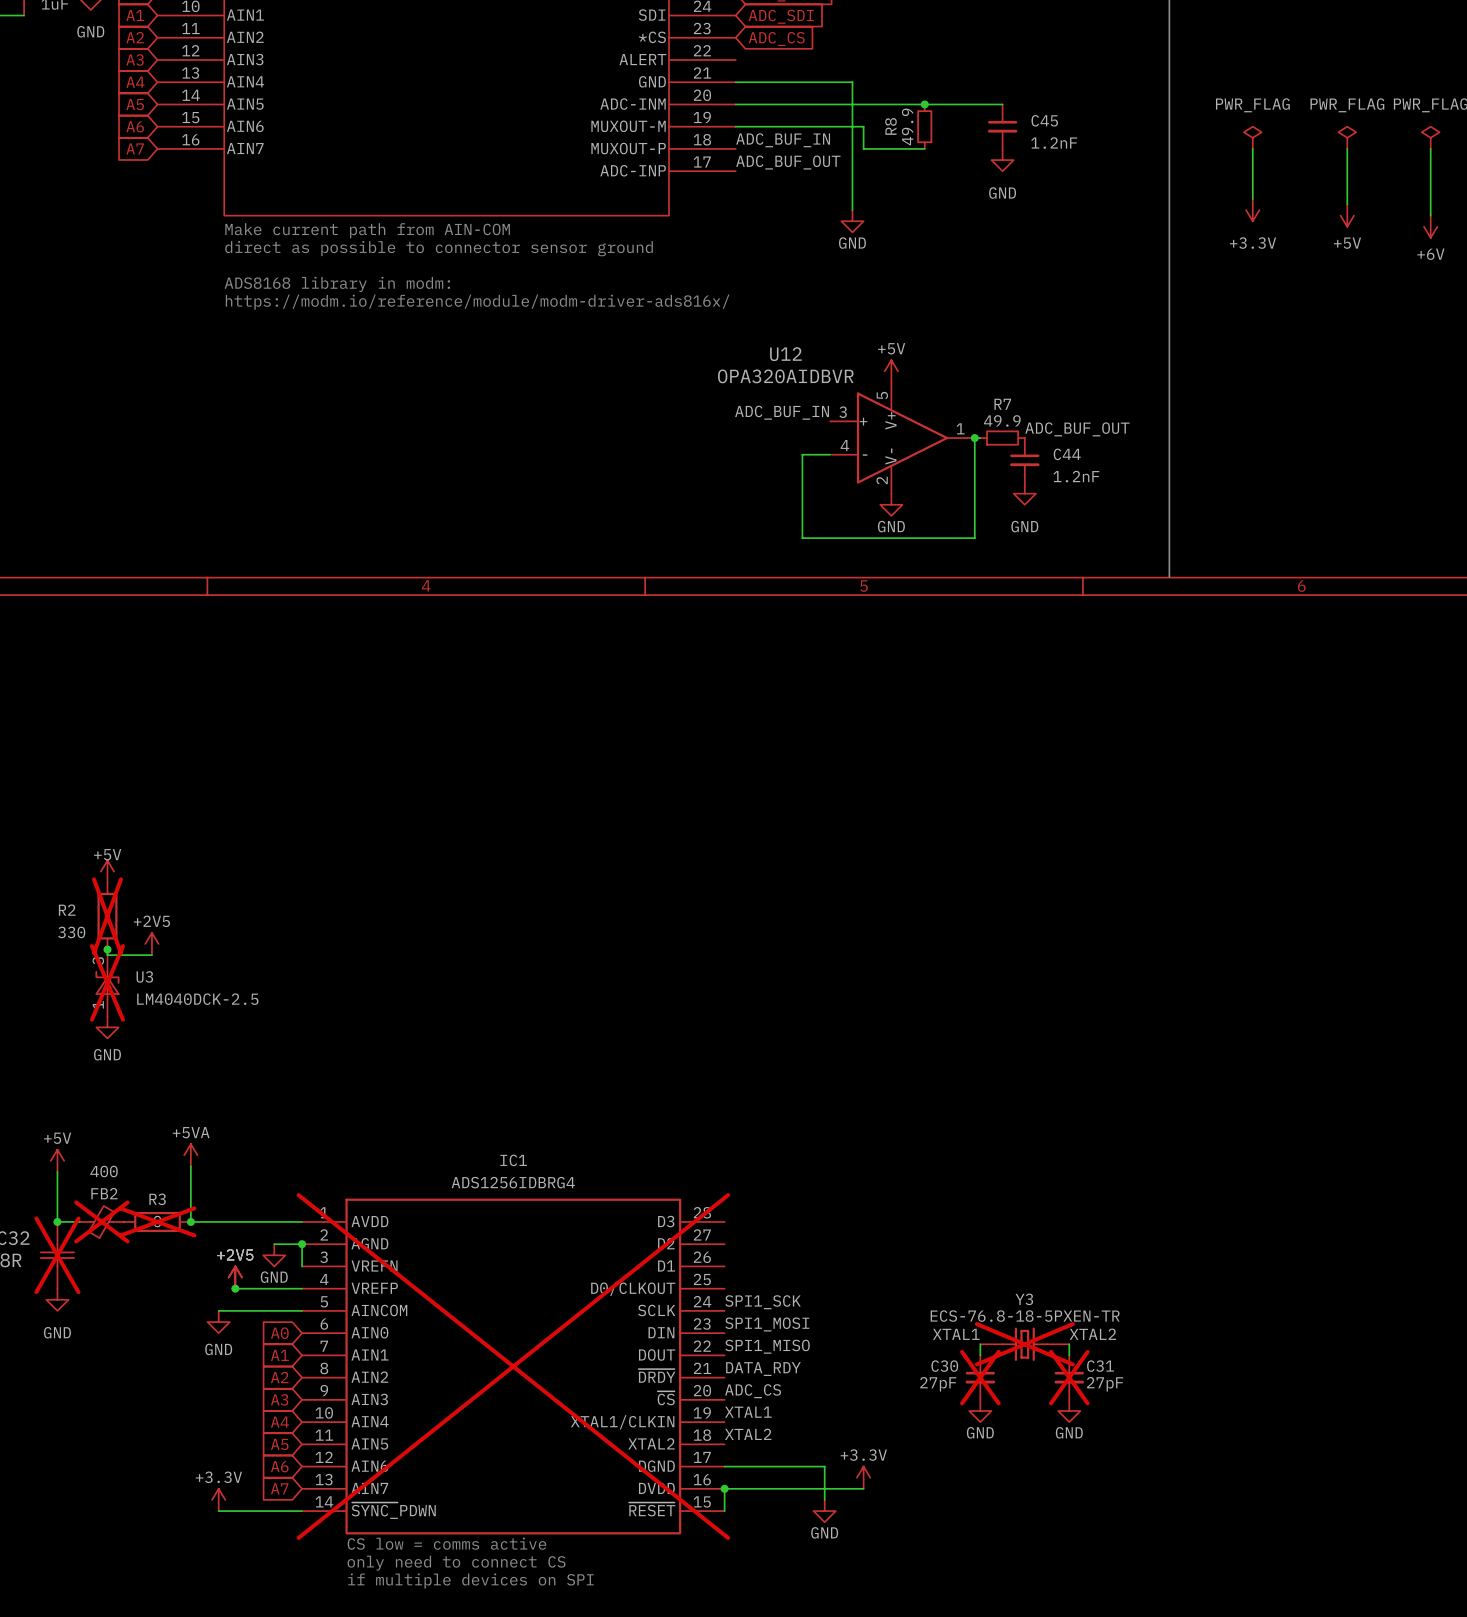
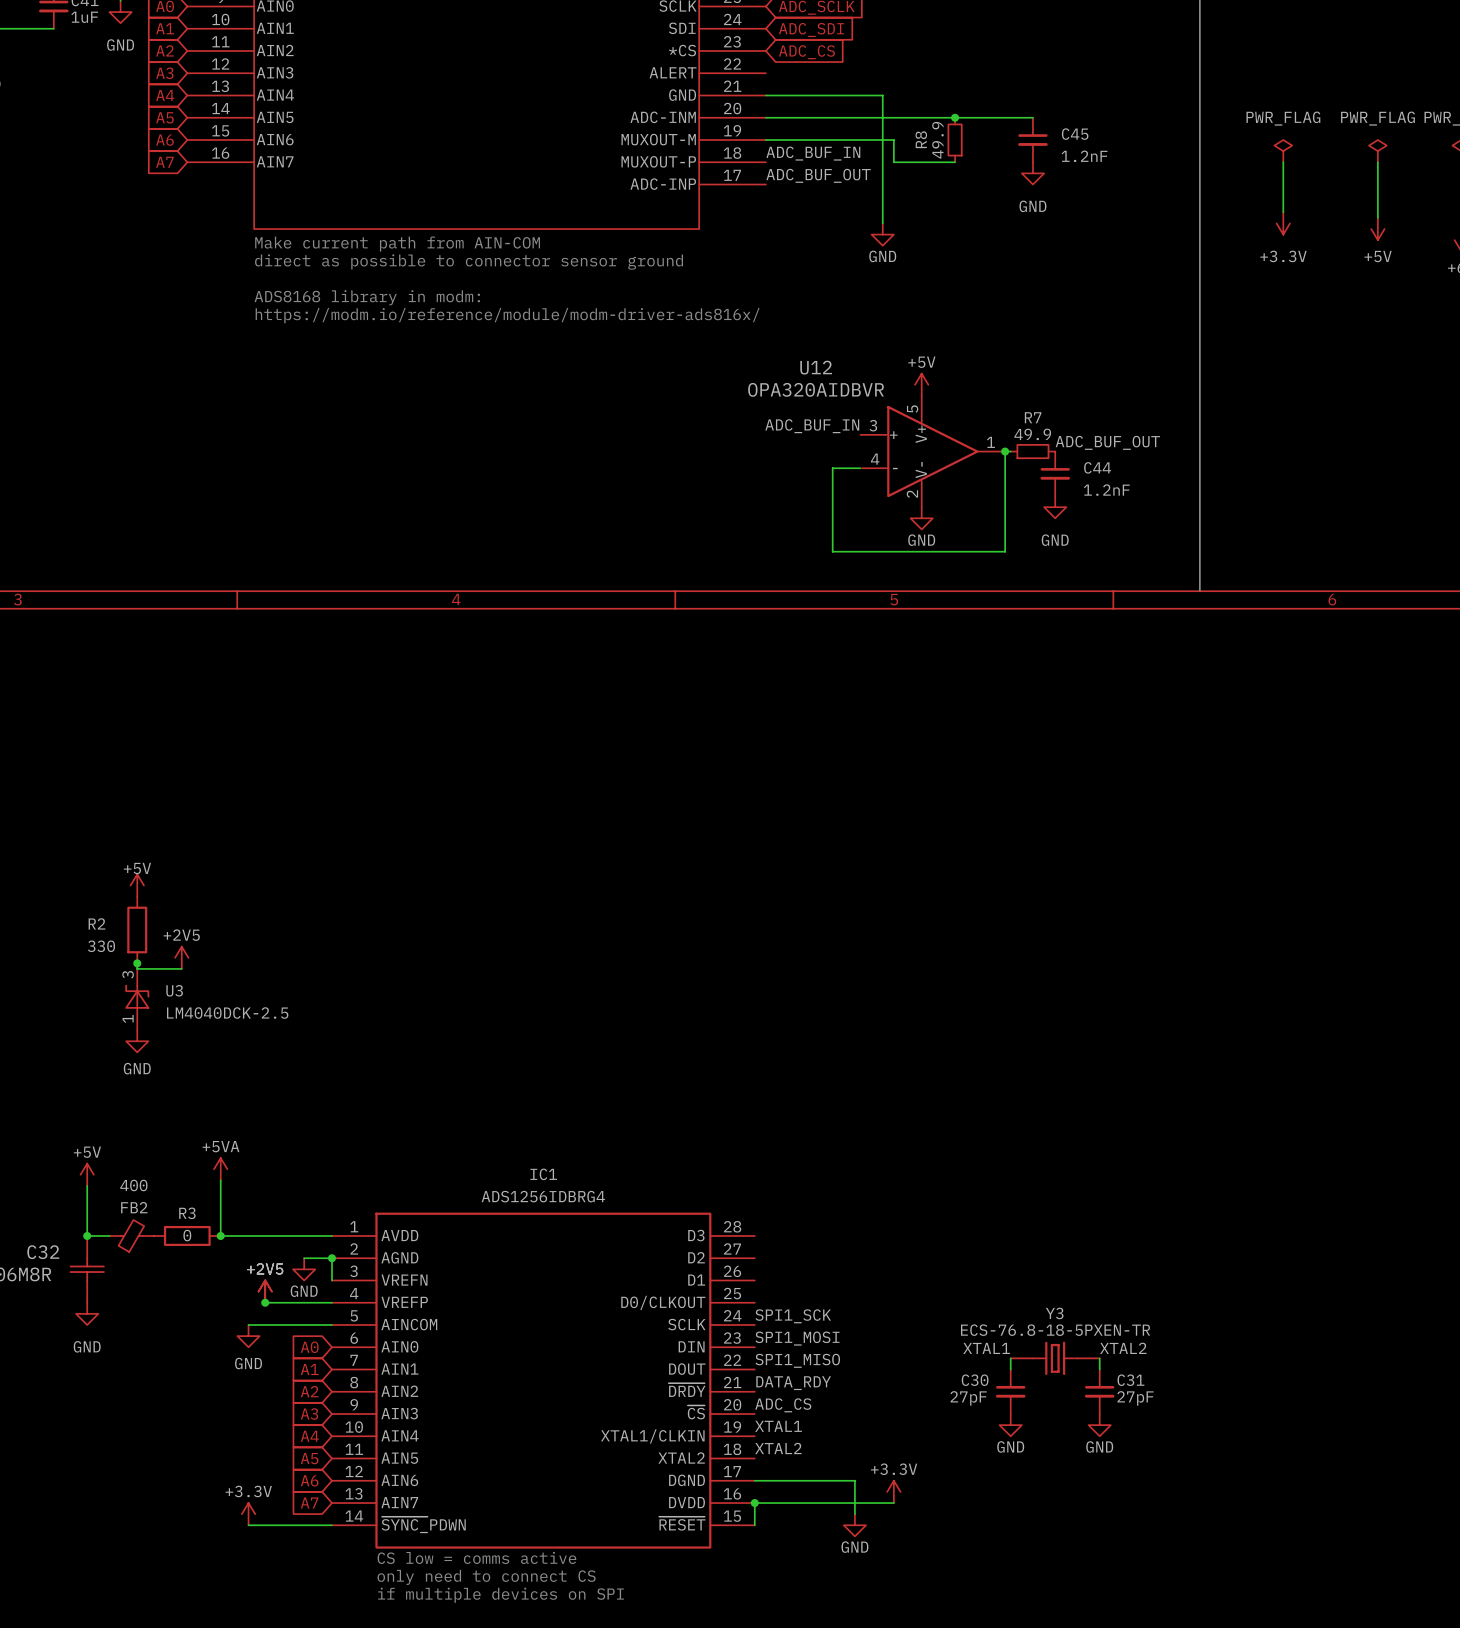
R2 do-not-place cross: (107, 916) -> none
U3 do-not-place cross: (107, 982) -> none
FB2 do-not-place cross: (101, 1221) -> none
R3 do-not-place cross: (157, 1221) -> none
C32 do-not-place cross: (57, 1255) -> none
Y3 do-not-place cross: (1024, 1344) -> none
IC1 do-not-place cross: (513, 1366) -> none
C30 do-not-place cross: (980, 1377) -> none
C31 do-not-place cross: (1069, 1377) -> none

